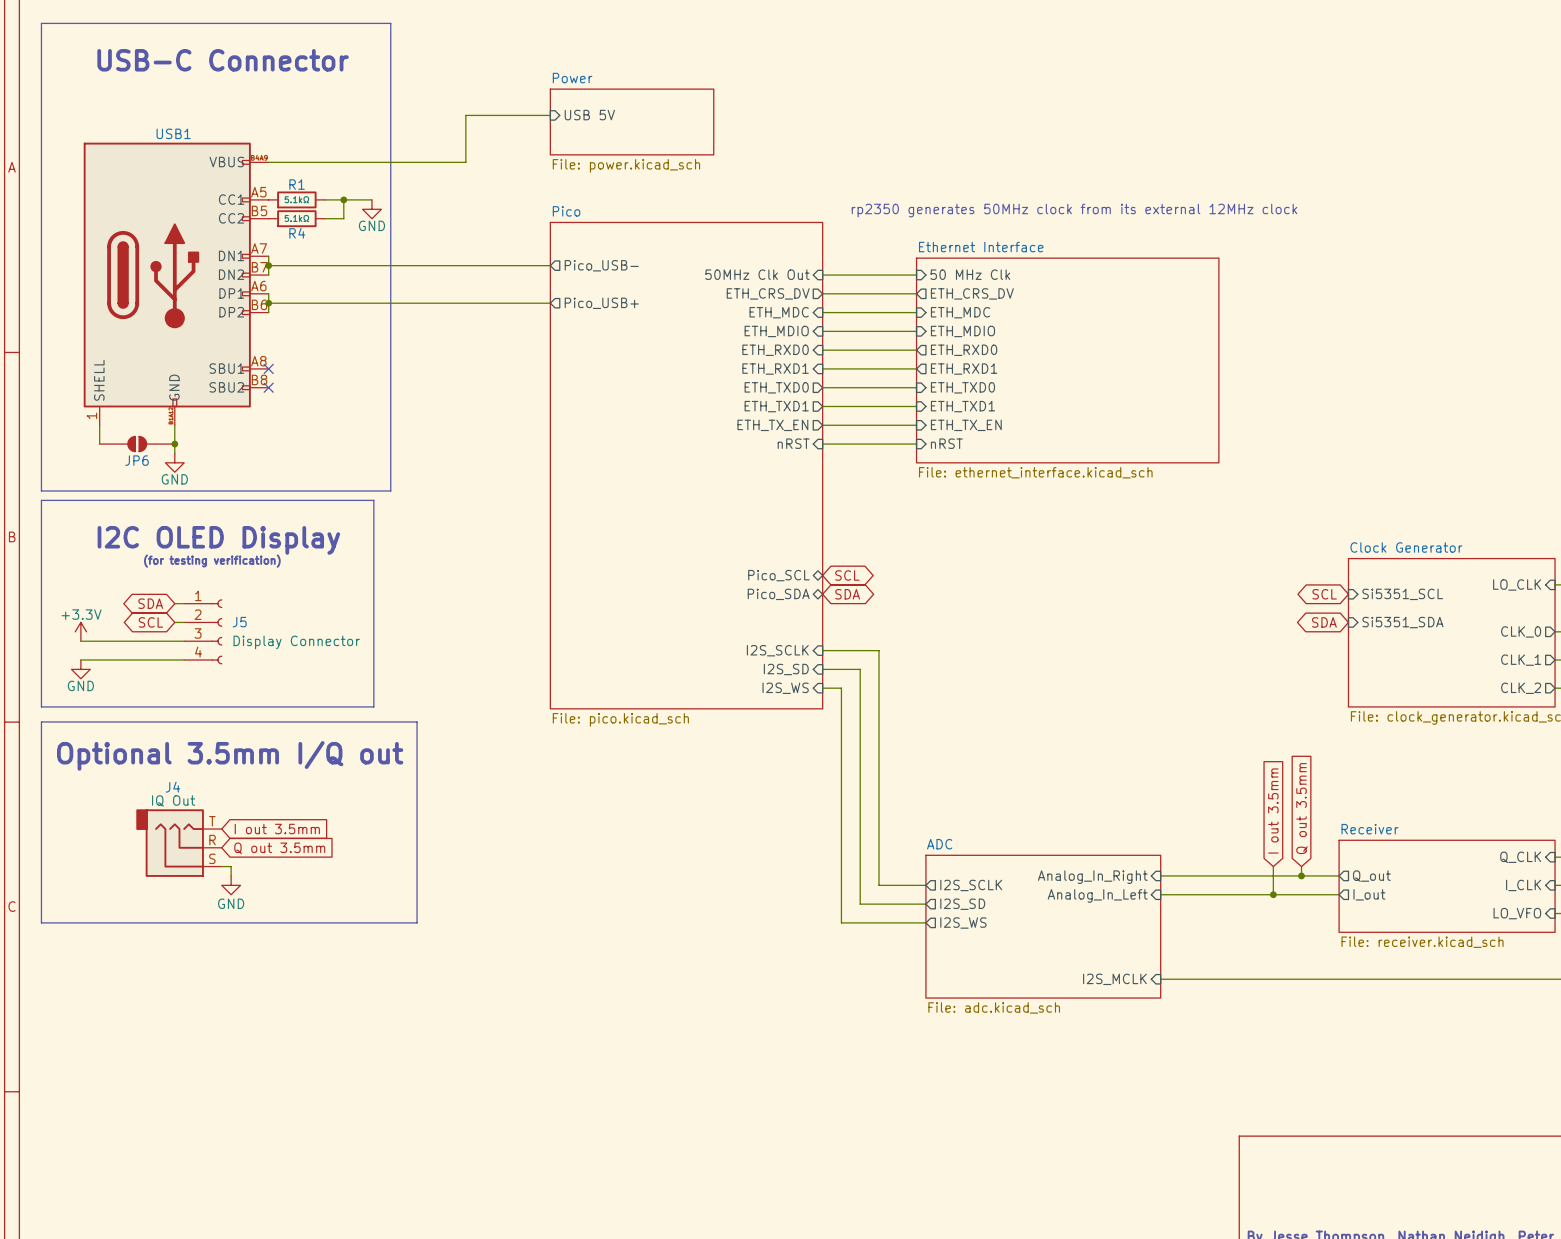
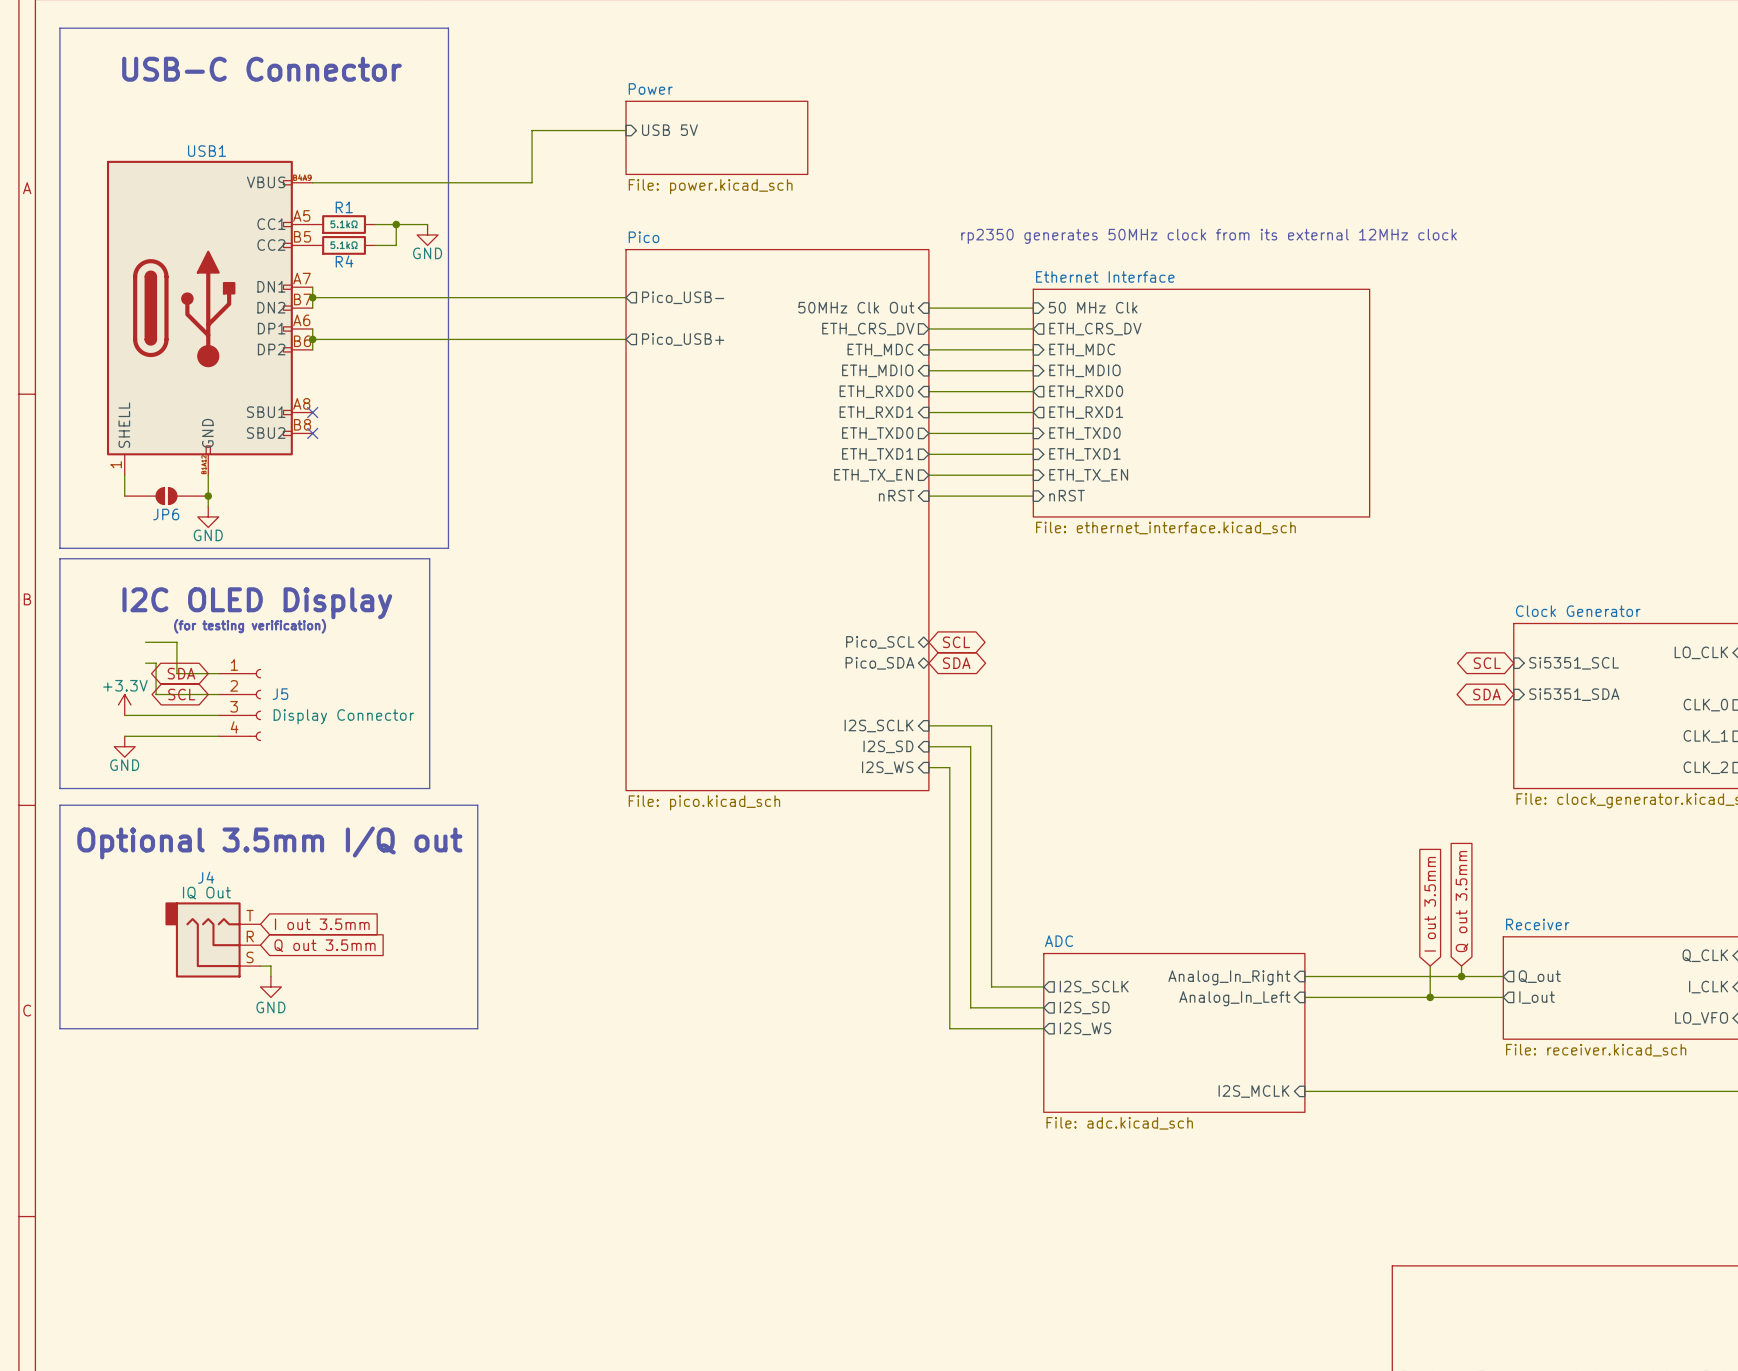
wire: none -> (145, 642) (176, 642) (176, 673) (208, 673)
wire: none -> (145, 663) (156, 663) (156, 694) (208, 694)
power symbol position: +3.3V (80, 631) -> +3.3V (124, 704)
wire: (80, 641) (99, 641) -> none
wire: (80, 660) (99, 660) -> none
power symbol position: GND (80, 669) -> GND (124, 746)

